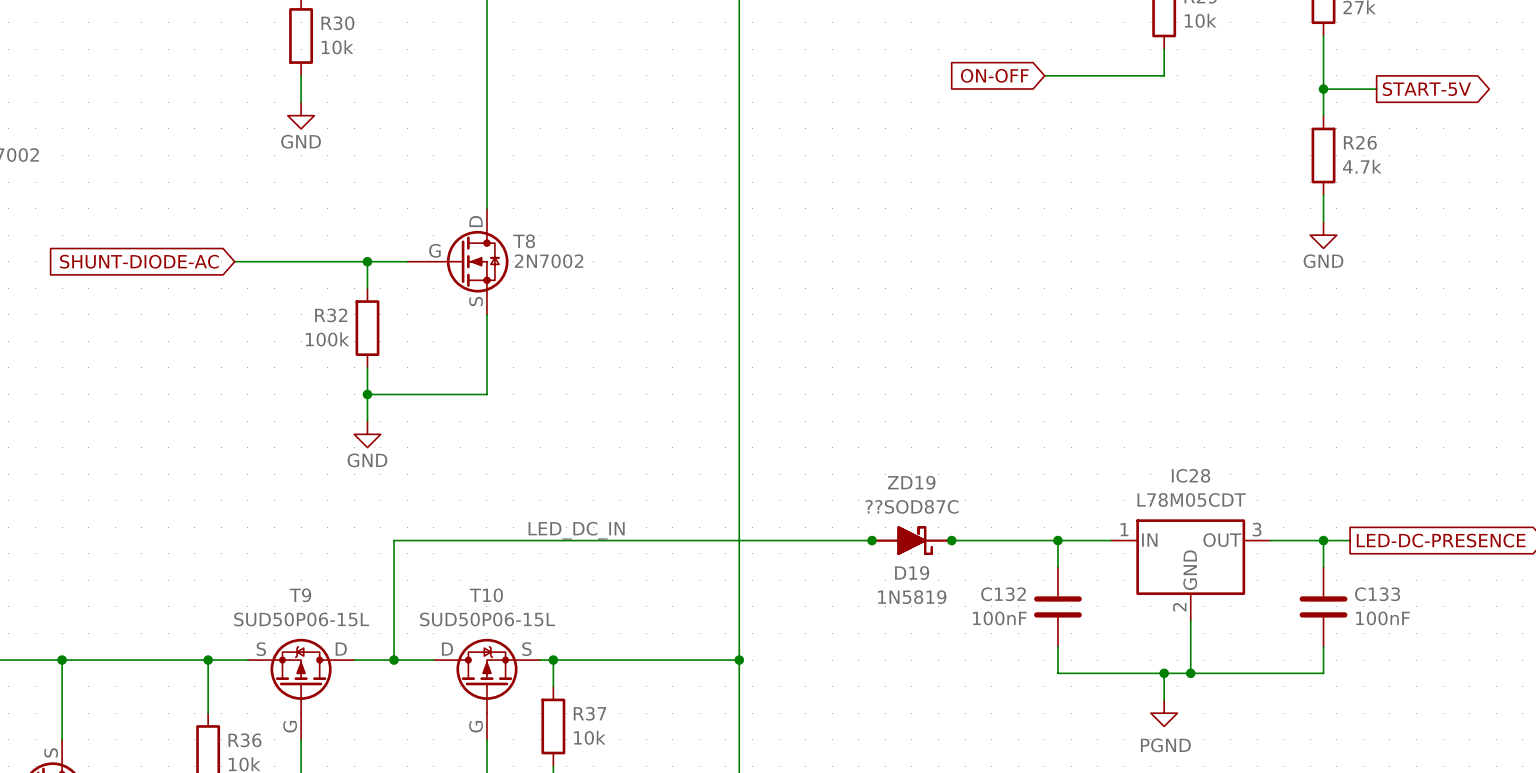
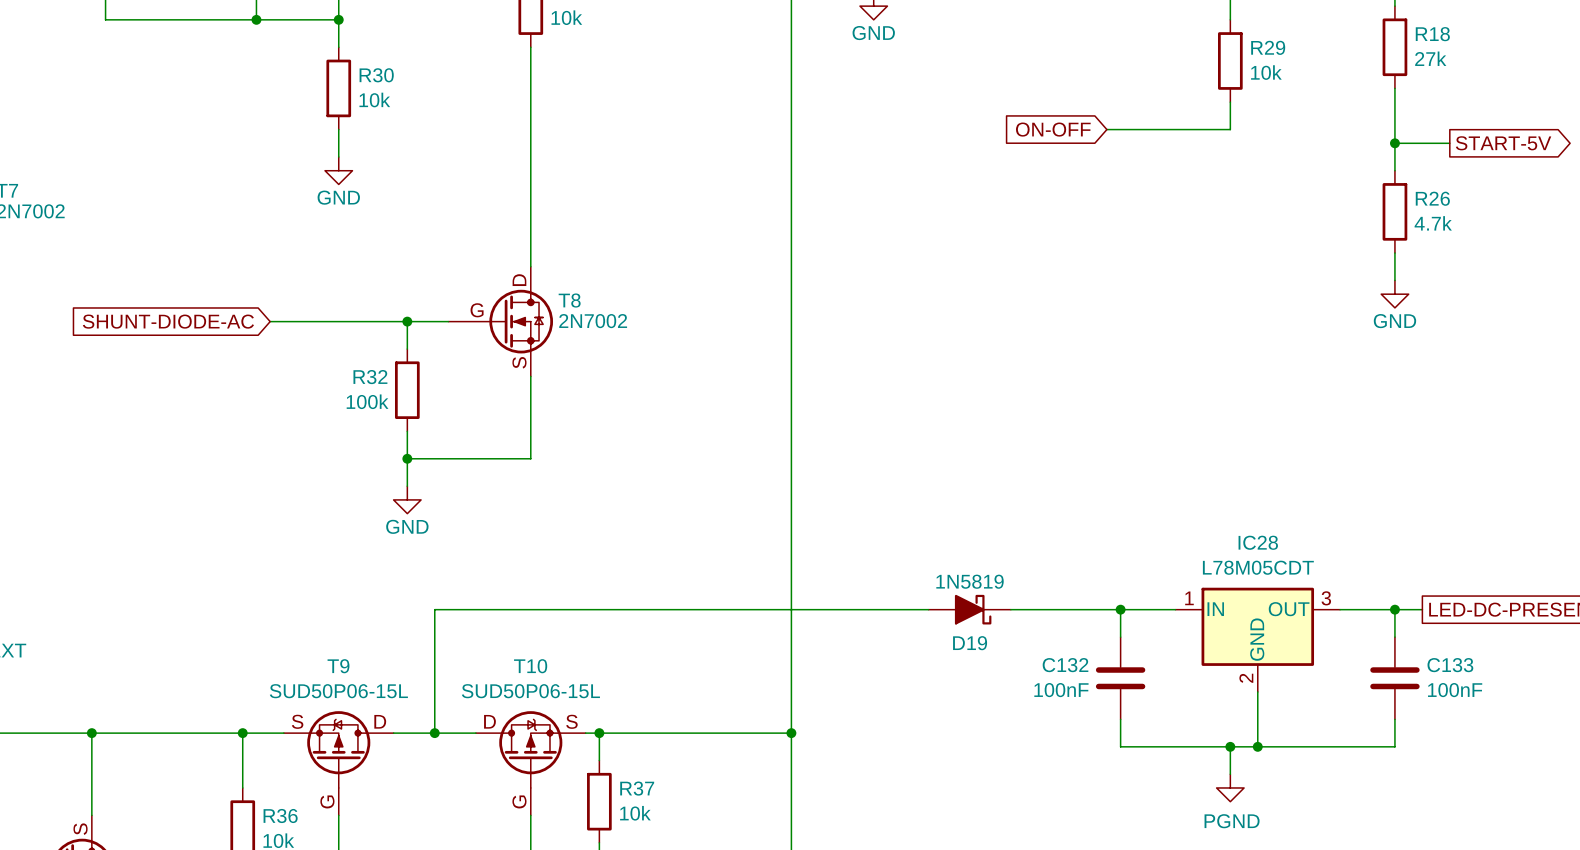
label: LED_DC_IN (576, 530) -> none
junction: (872, 540) -> none
ZD19: ??SOD87C (911, 540) -> none
junction: (951, 540) -> none
D19 value position: 1N5819 (912, 597) -> 1N5819 (970, 581)

